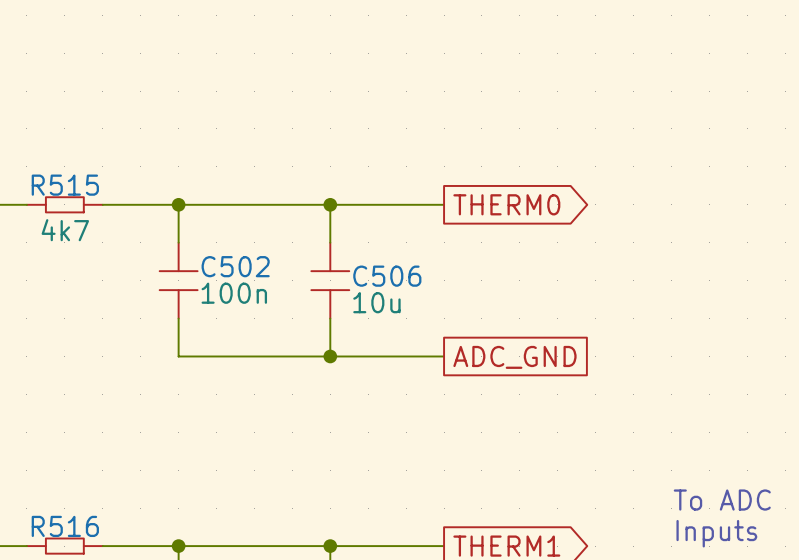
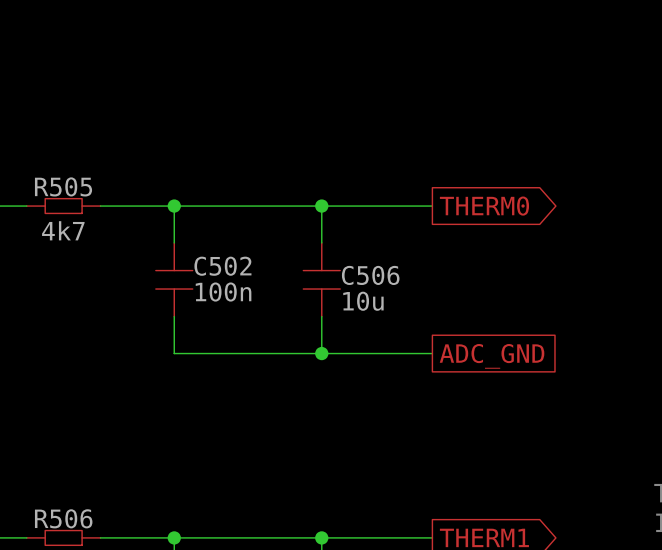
R515 name: R515 (65, 185) -> R505 (63, 186)
R516 name: R516 (65, 526) -> R506 (63, 518)

